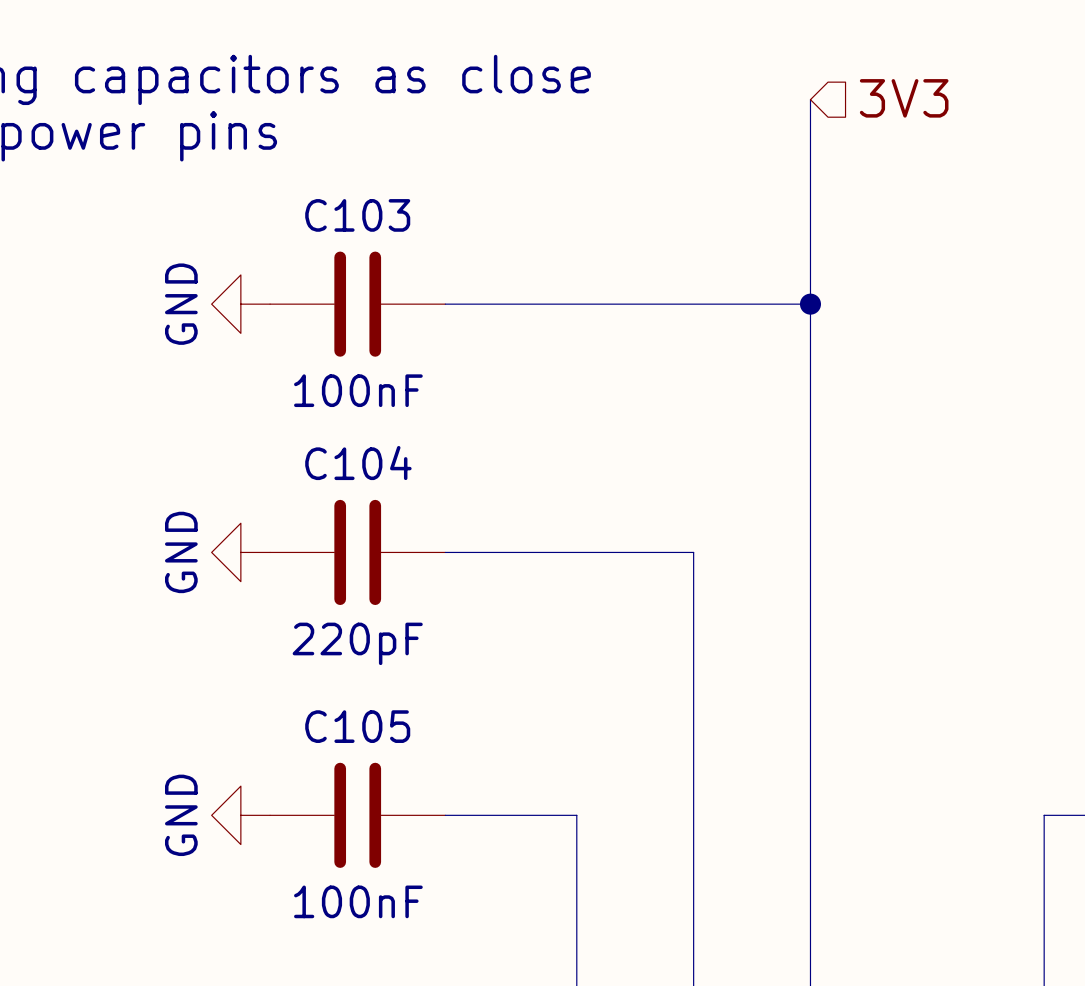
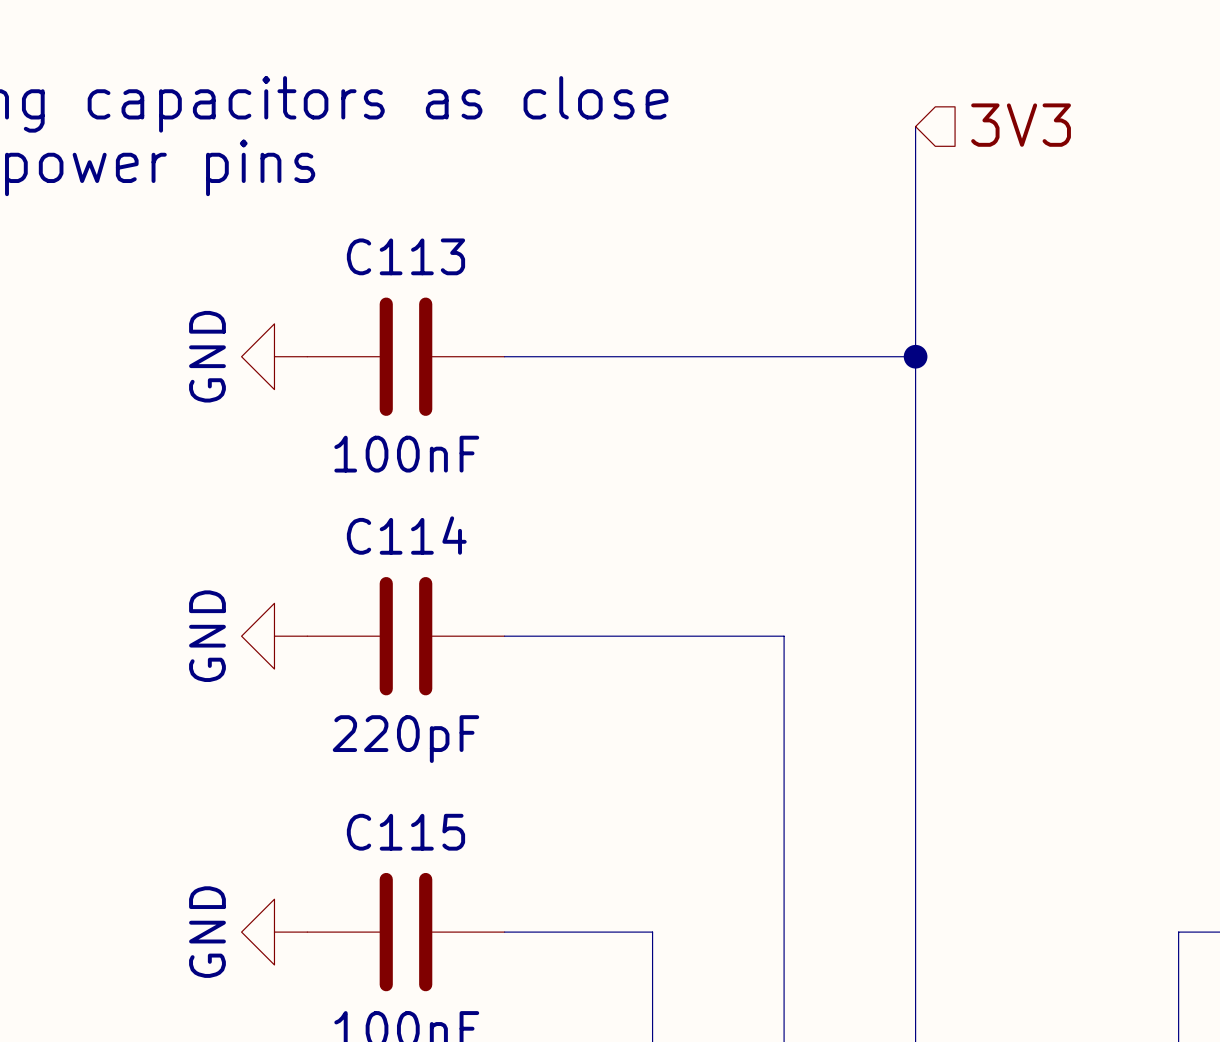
C103 name: C103 (357, 215) -> C113 (405, 256)
C104 name: C104 (358, 463) -> C114 (406, 535)
C105 name: C105 (357, 726) -> C115 (405, 832)

